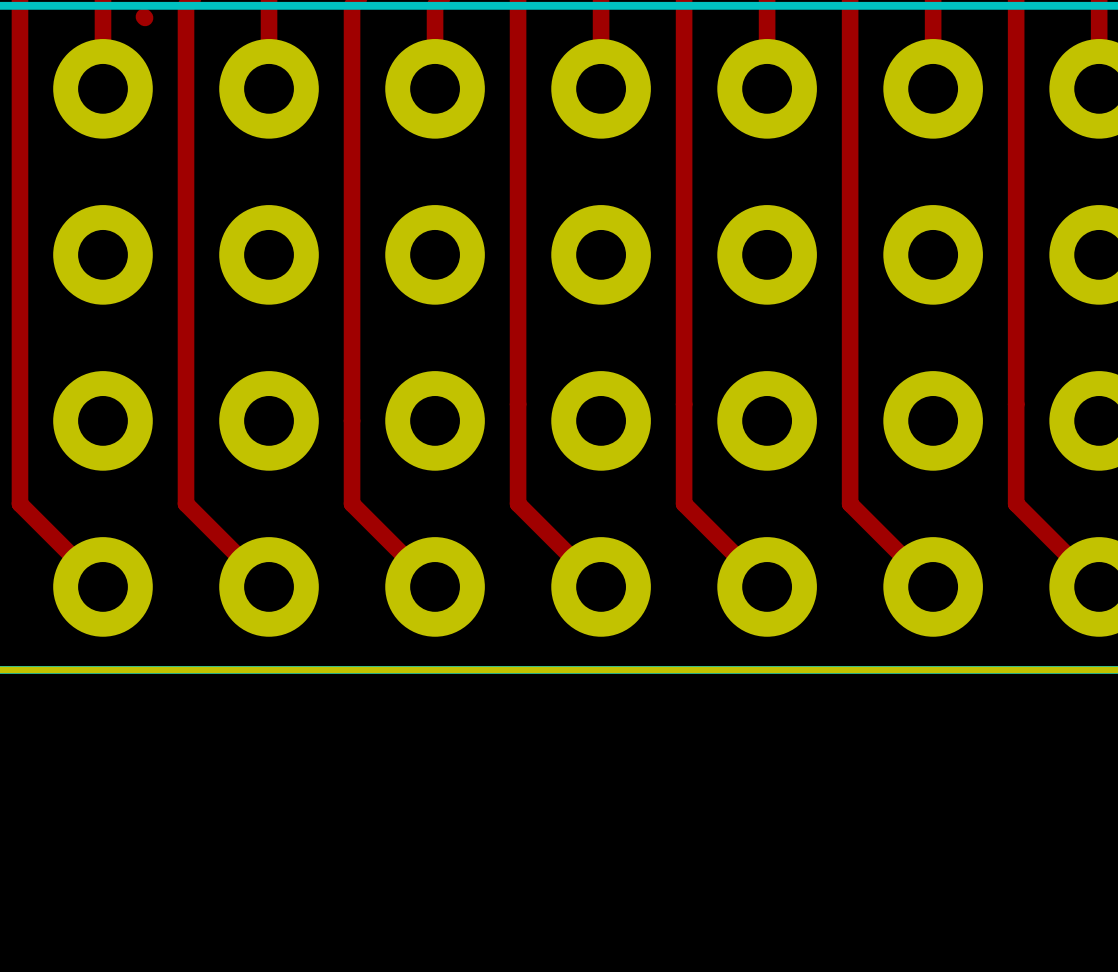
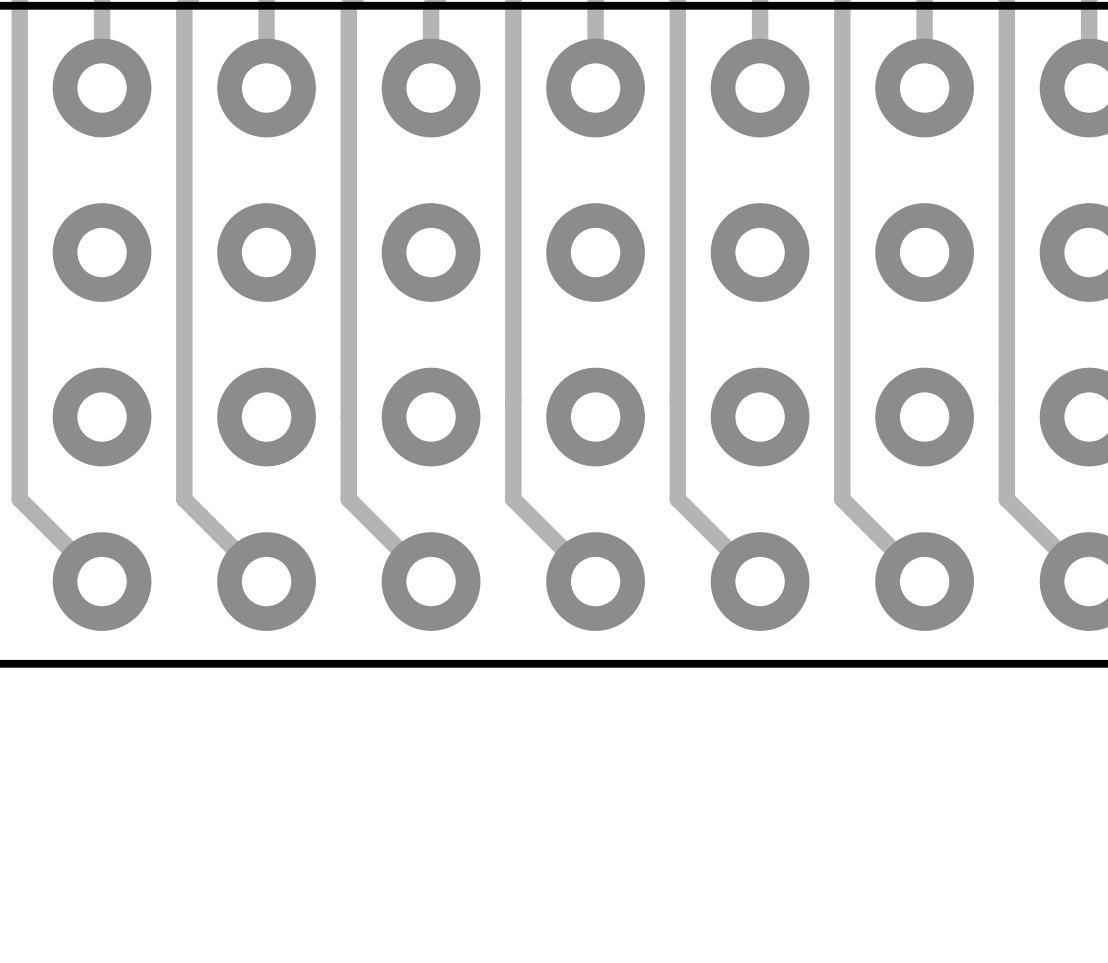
track: (143, 16) (145, 17) -> none

